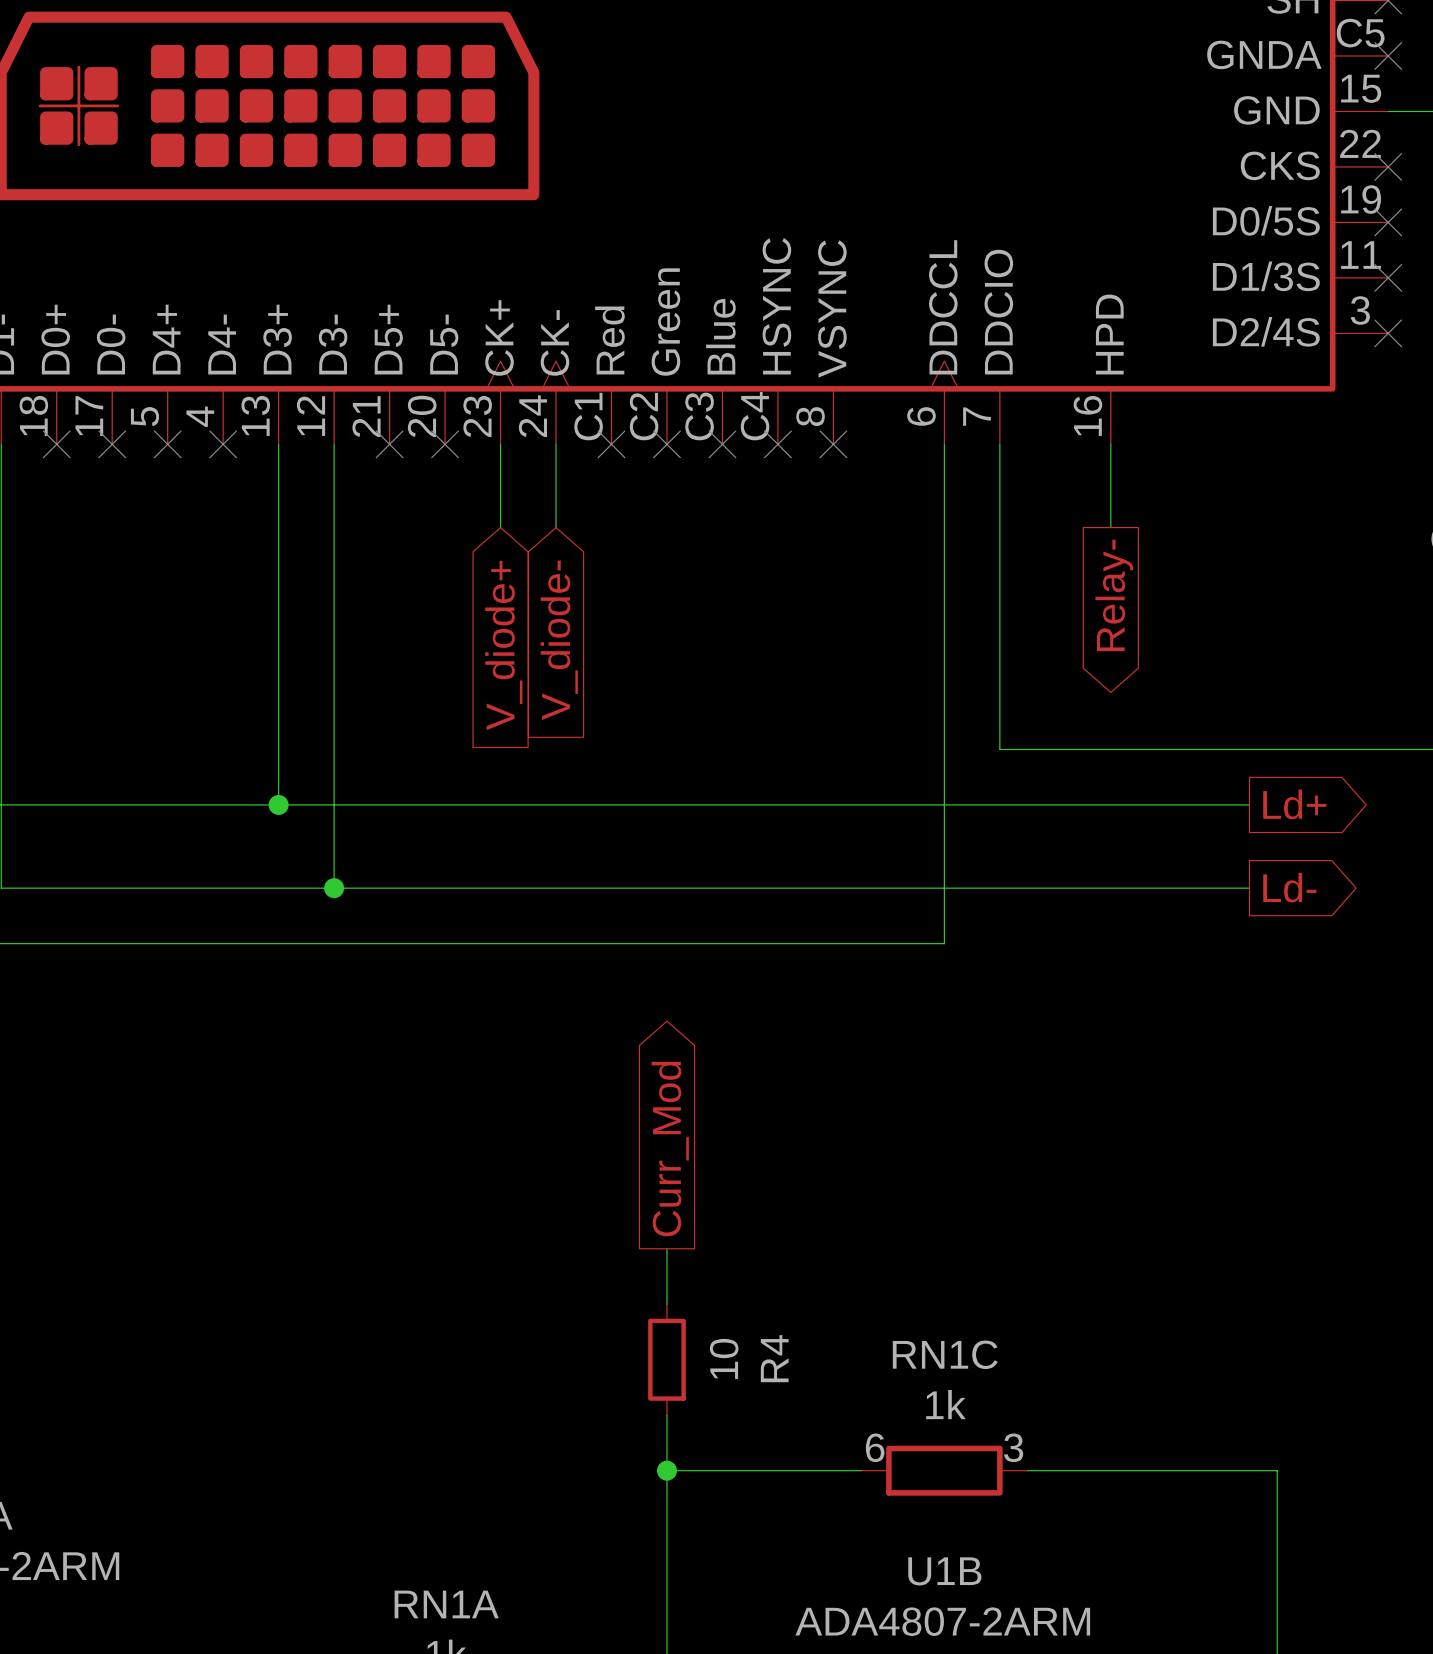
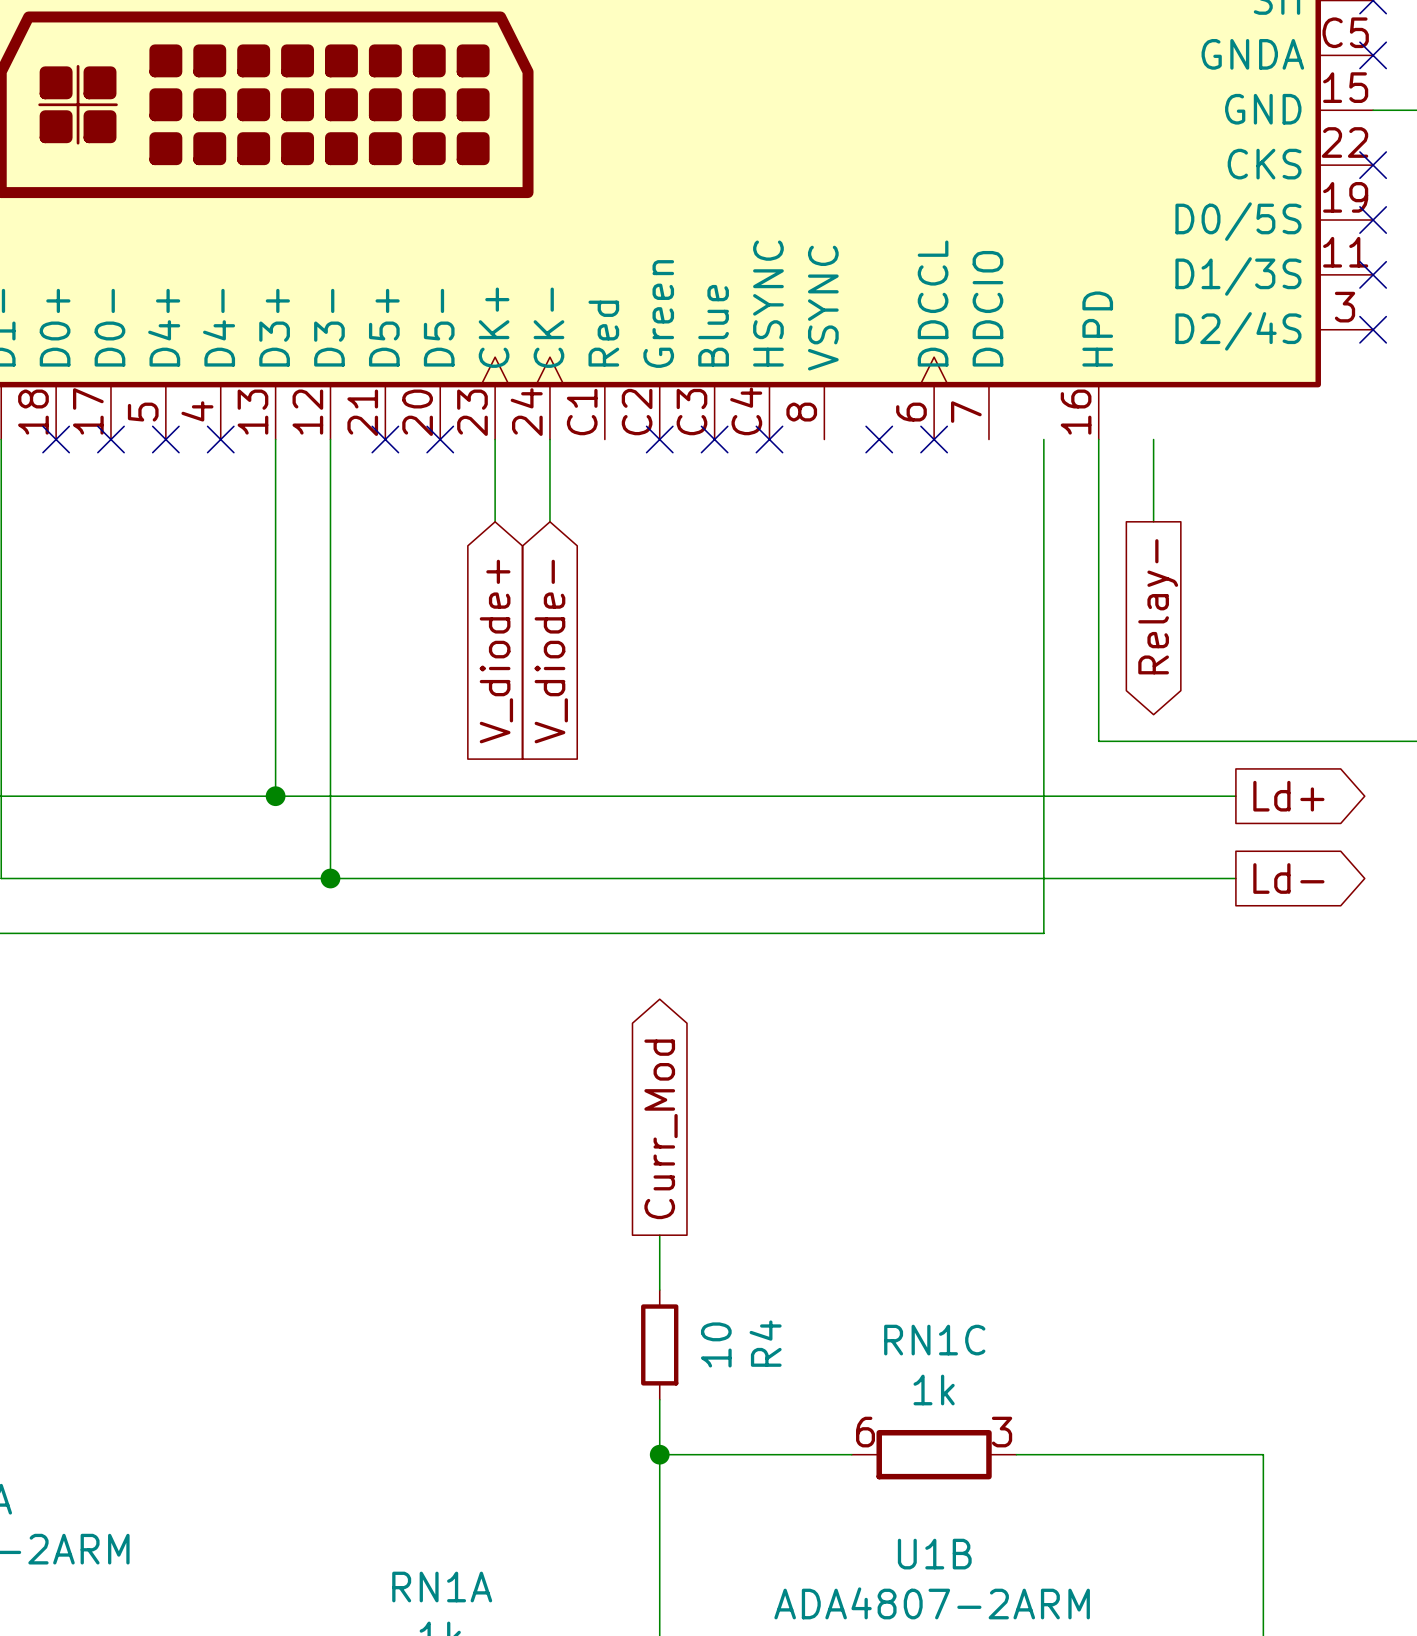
no-connect mark: (611, 444) -> none
no-connect mark: (833, 444) -> none
no-connect mark: none -> (879, 439)
wire: (944, 444) (944, 943) -> (1043, 439) (1043, 933) (934, 933)
no-connect mark: none -> (934, 439)
wire: (999, 444) (999, 749) (1110, 749) -> (1098, 521) (1098, 741)
wire: none -> (1153, 439) (1153, 521)
global label position: Relay- (1114, 595) -> Relay- (1158, 606)

